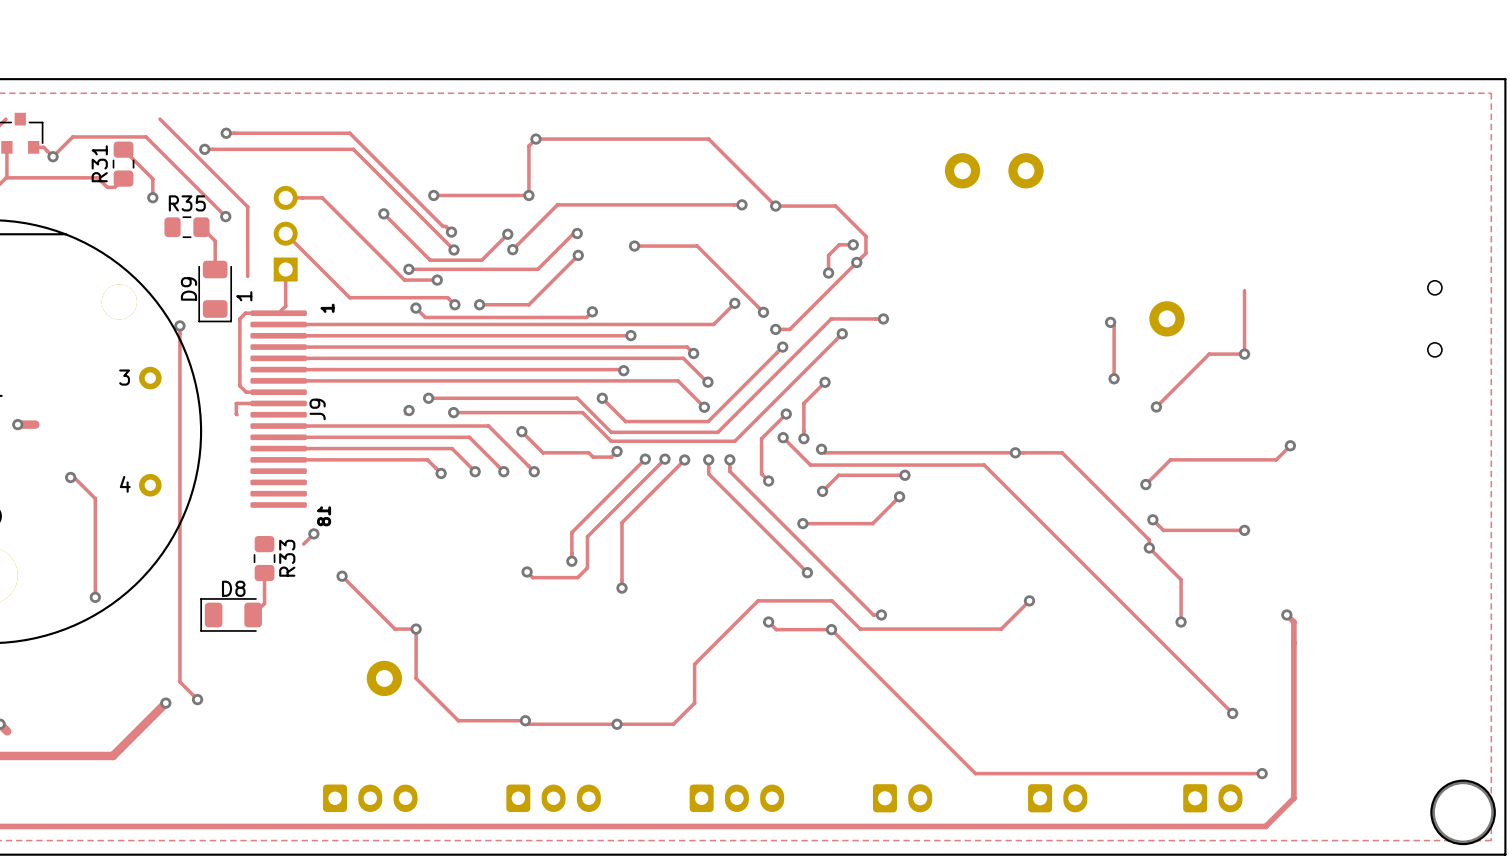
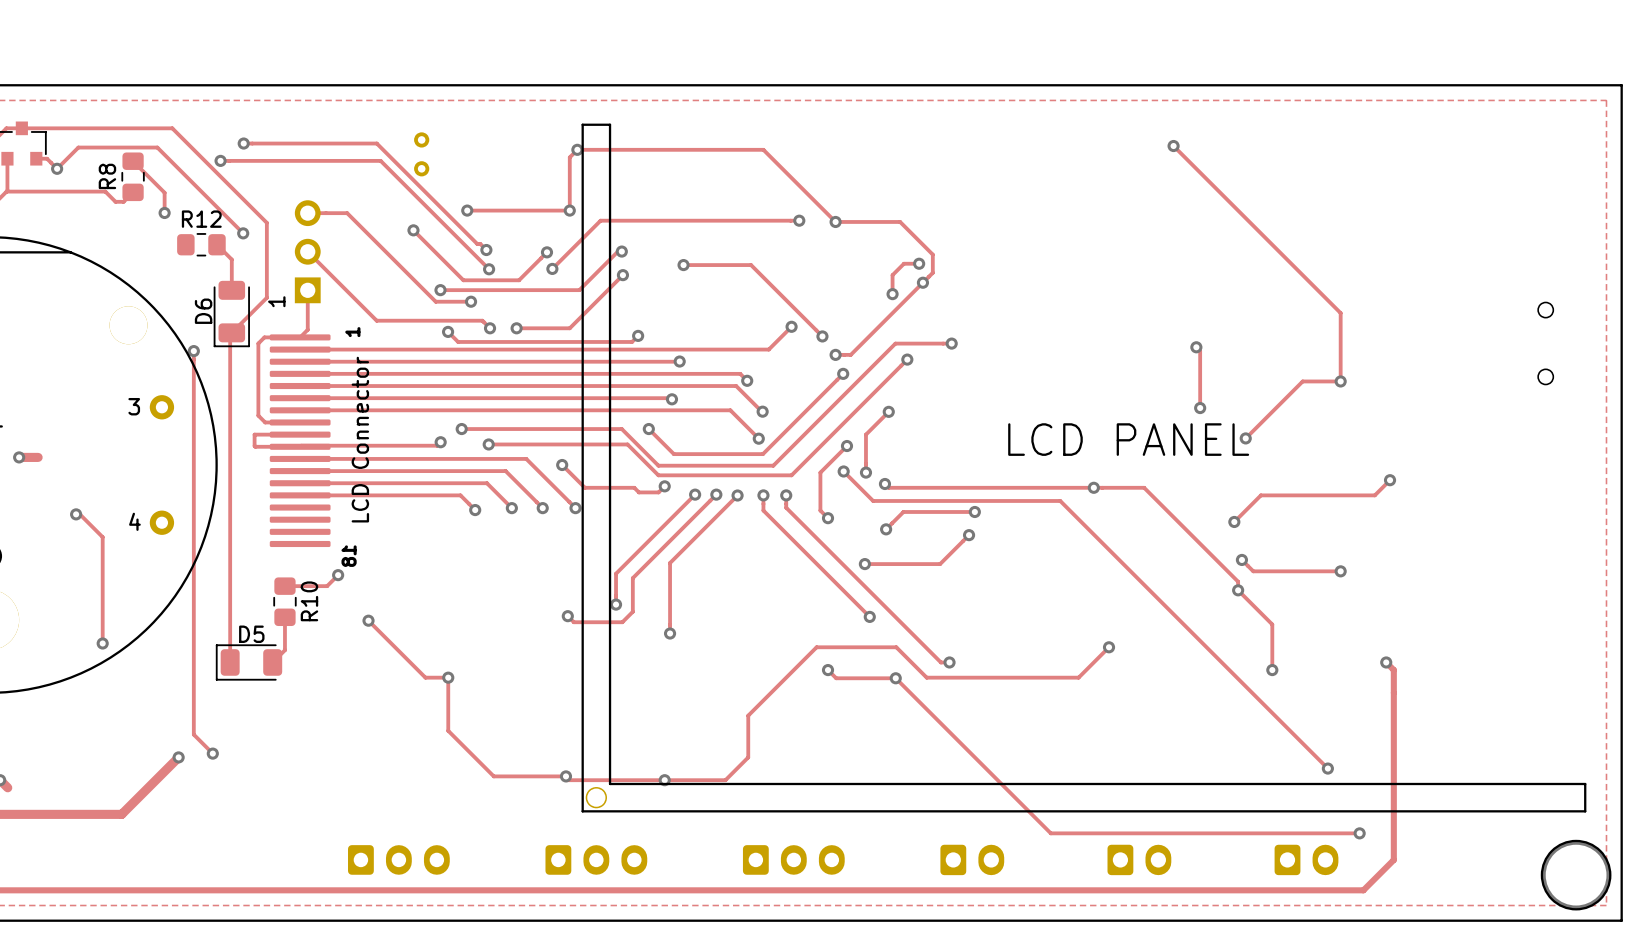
track: none -> (6, 128) (172, 128)
track: none -> (1173, 146) (1340, 313)
via: none -> (1173, 146)
part: none -> (421, 154)
R31 name: R31 (99, 163) -> R8 (107, 176)
part: (962, 170) -> none
part: (1025, 170) -> none
R35 name: R35 (187, 203) -> R12 (201, 219)
track: none -> (266, 297) (230, 334) (230, 662)
D9 name: D9 (188, 288) -> D6 (203, 311)
part: (1166, 318) -> none
J9: (278, 409) -> none
track: none -> (437, 445) (255, 446)
part: none -> LCD Connector (928, 468)
track: none -> (284, 586) (327, 586)
R33 name: R33 (287, 558) -> R10 (309, 601)
D8 name: D8 (233, 588) -> D5 (251, 634)
part: (384, 678) -> none

